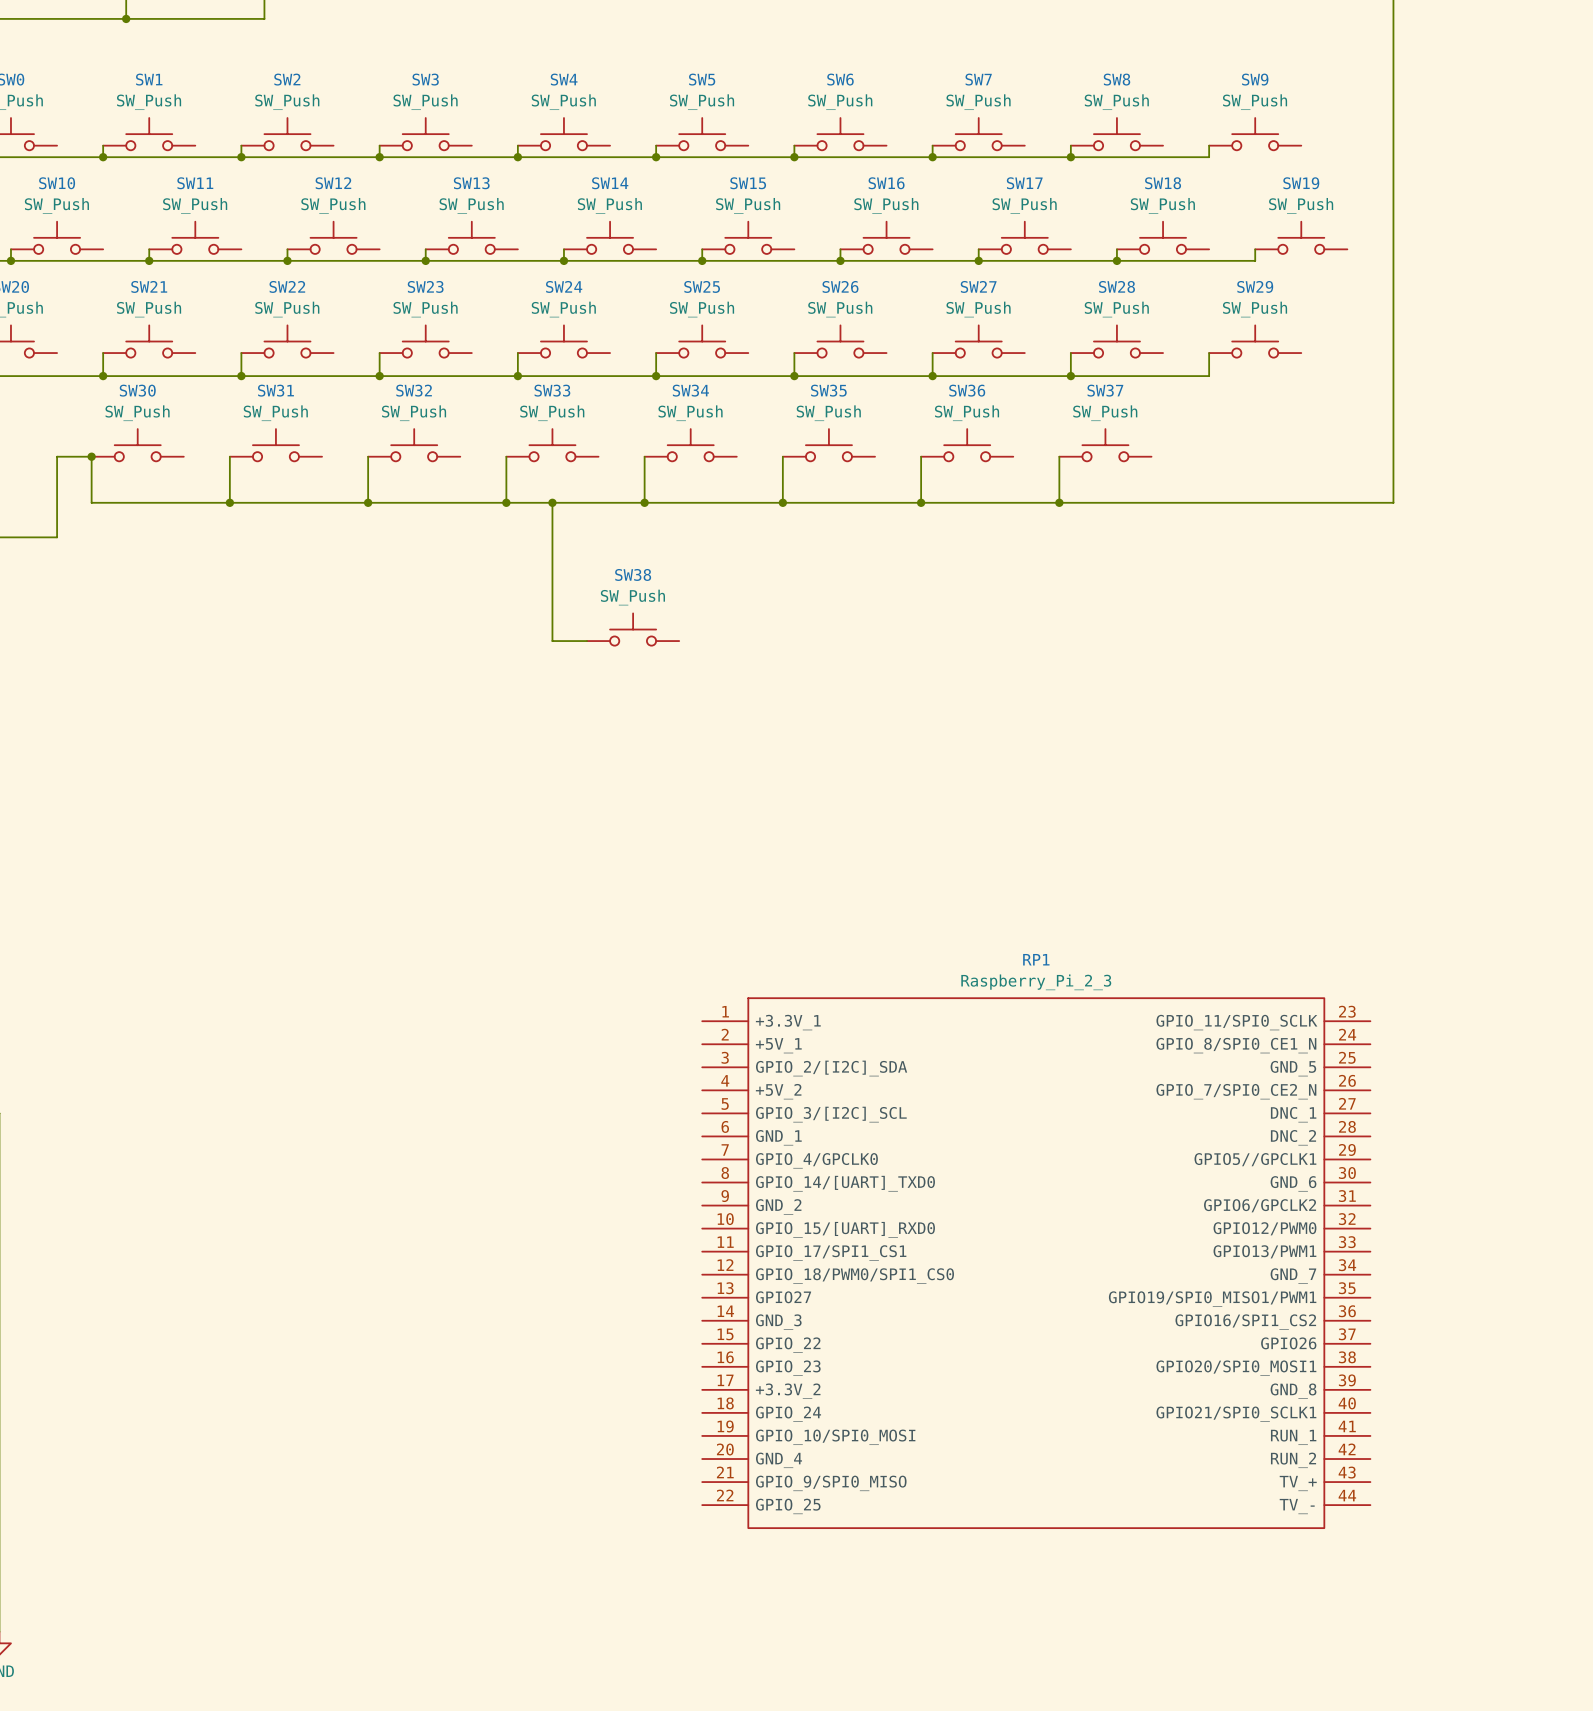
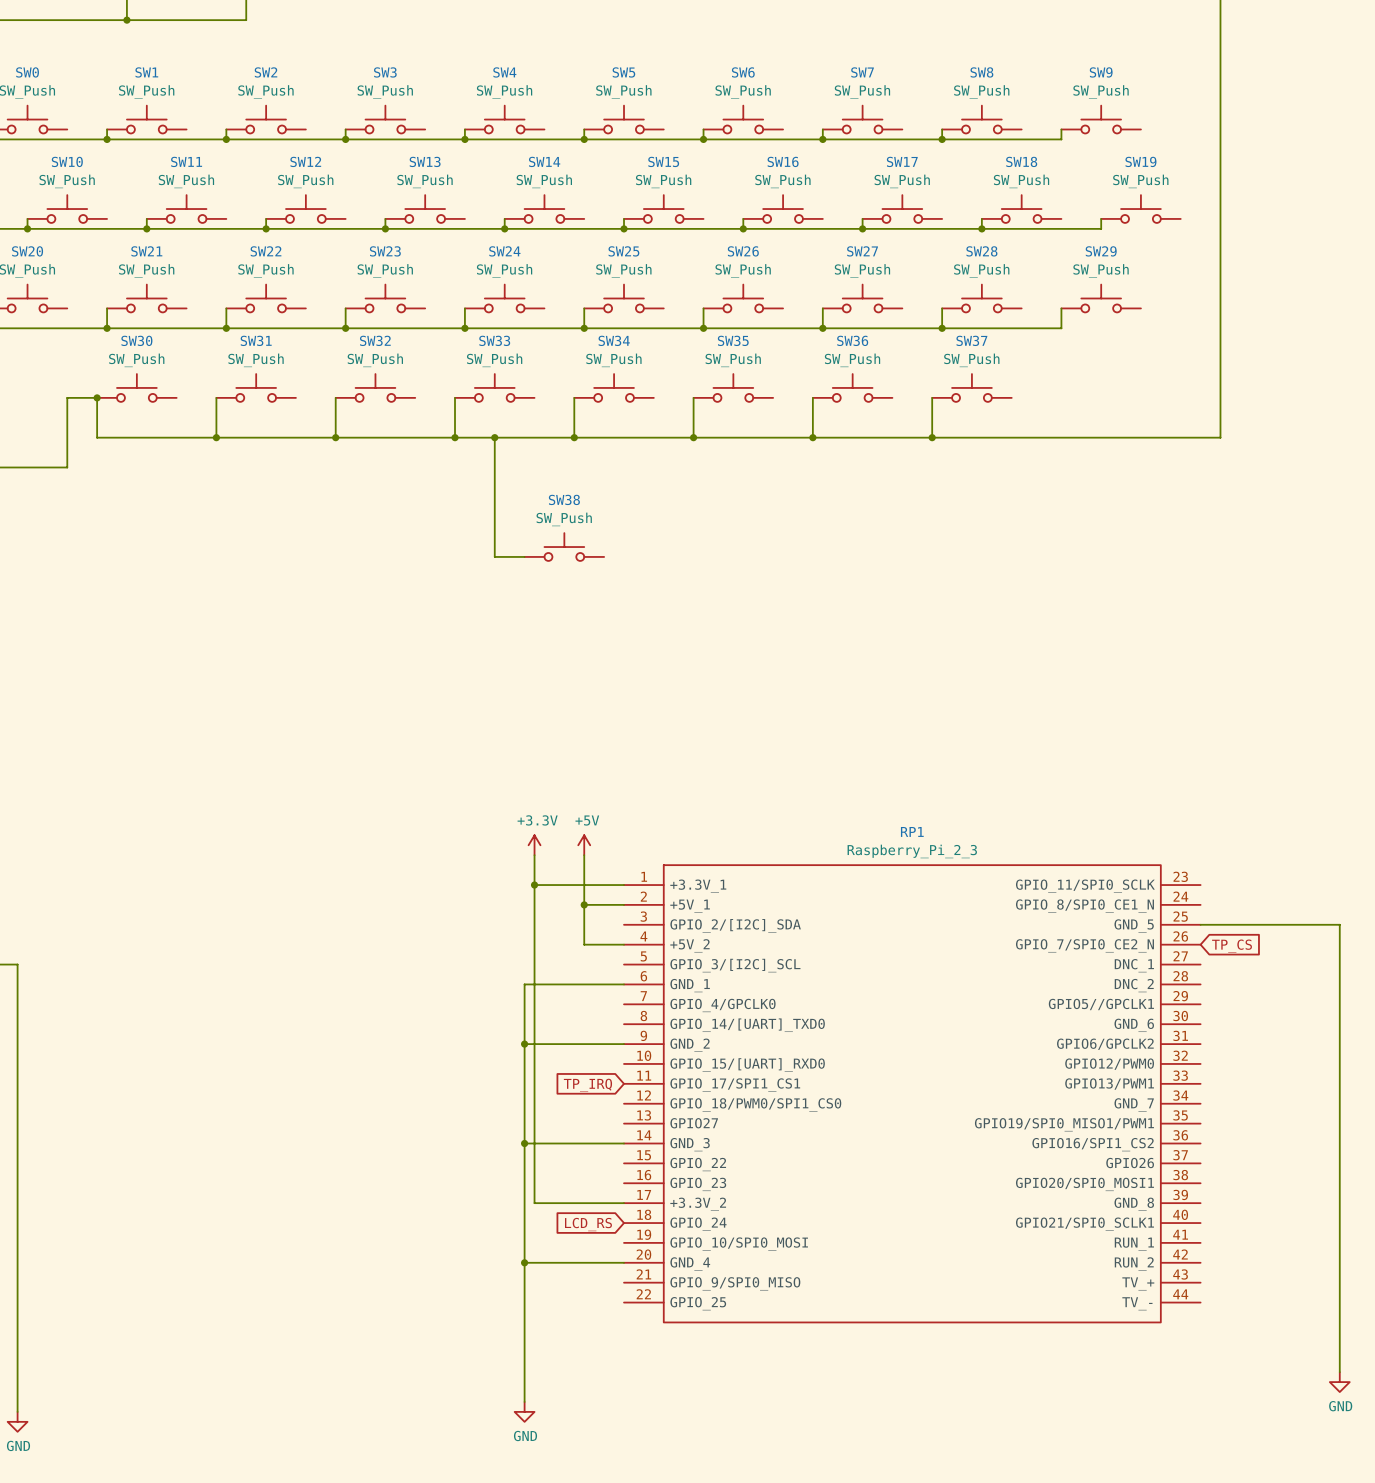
power symbol: none -> +3.3V (534, 845)
power symbol: none -> +5V (584, 845)
wire: none -> (534, 855) (534, 1203) (624, 1203)
wire: none -> (584, 855) (584, 944) (624, 944)
wire: none -> (534, 885) (624, 885)
junction: none -> (534, 885)
wire: none -> (584, 904) (624, 904)
junction: none -> (584, 904)
wire: none -> (1200, 924) (1339, 924) (1339, 1372)
global label: none -> TP_CS (1232, 946)
wire: none -> (624, 984) (524, 984) (524, 1401)
wire: none -> (524, 1044) (624, 1044)
junction: none -> (524, 1044)
global label: none -> TP_IRQ (587, 1085)
wire: none -> (524, 1143) (624, 1143)
junction: none -> (524, 1143)
global label: none -> LCD_RS (588, 1224)
wire: none -> (524, 1262) (624, 1262)
junction: none -> (524, 1262)
power symbol: none -> GND (1339, 1382)
power symbol: none -> GND (524, 1411)

